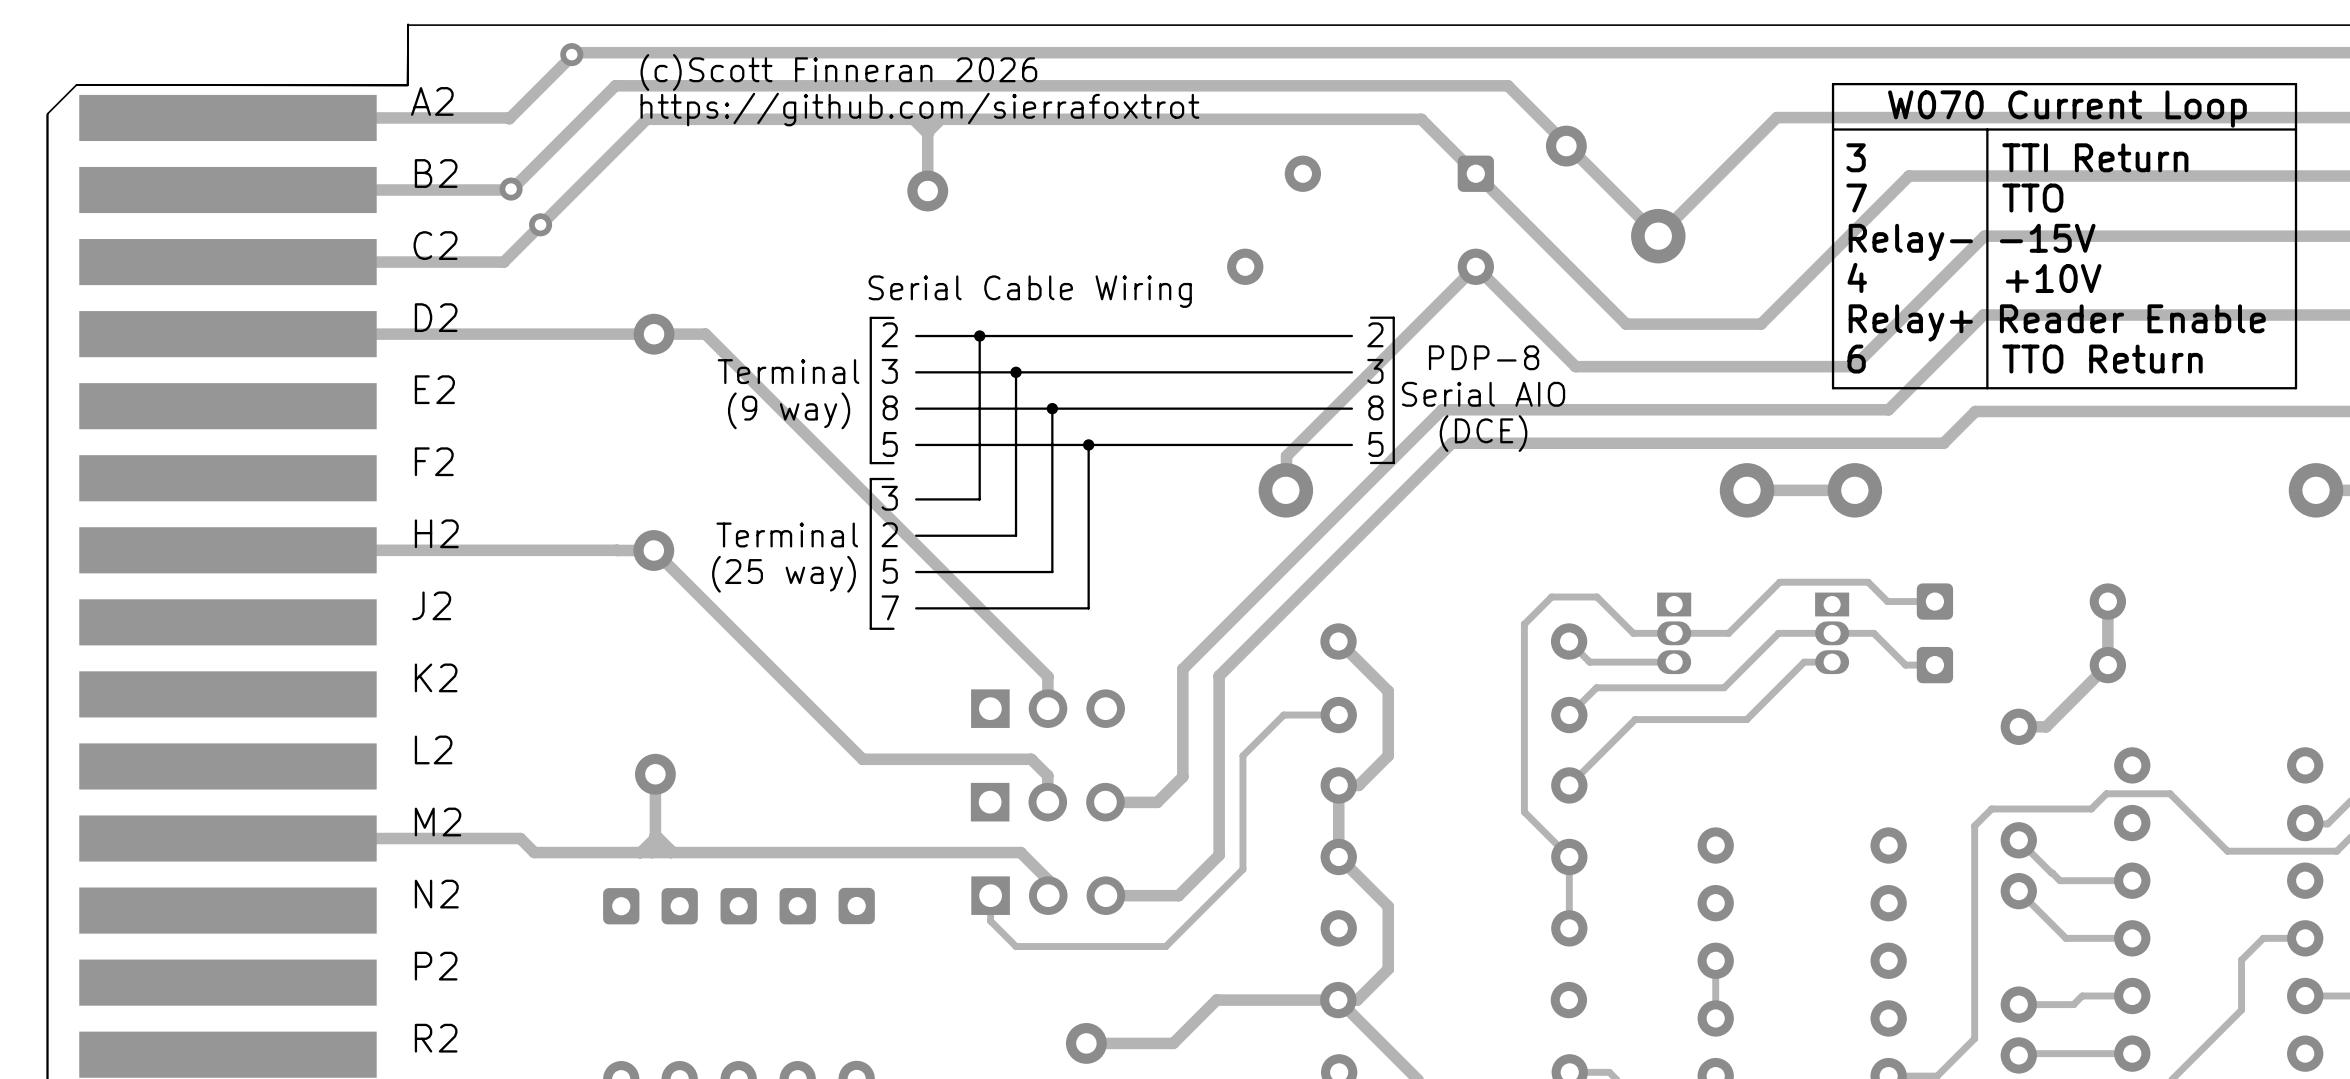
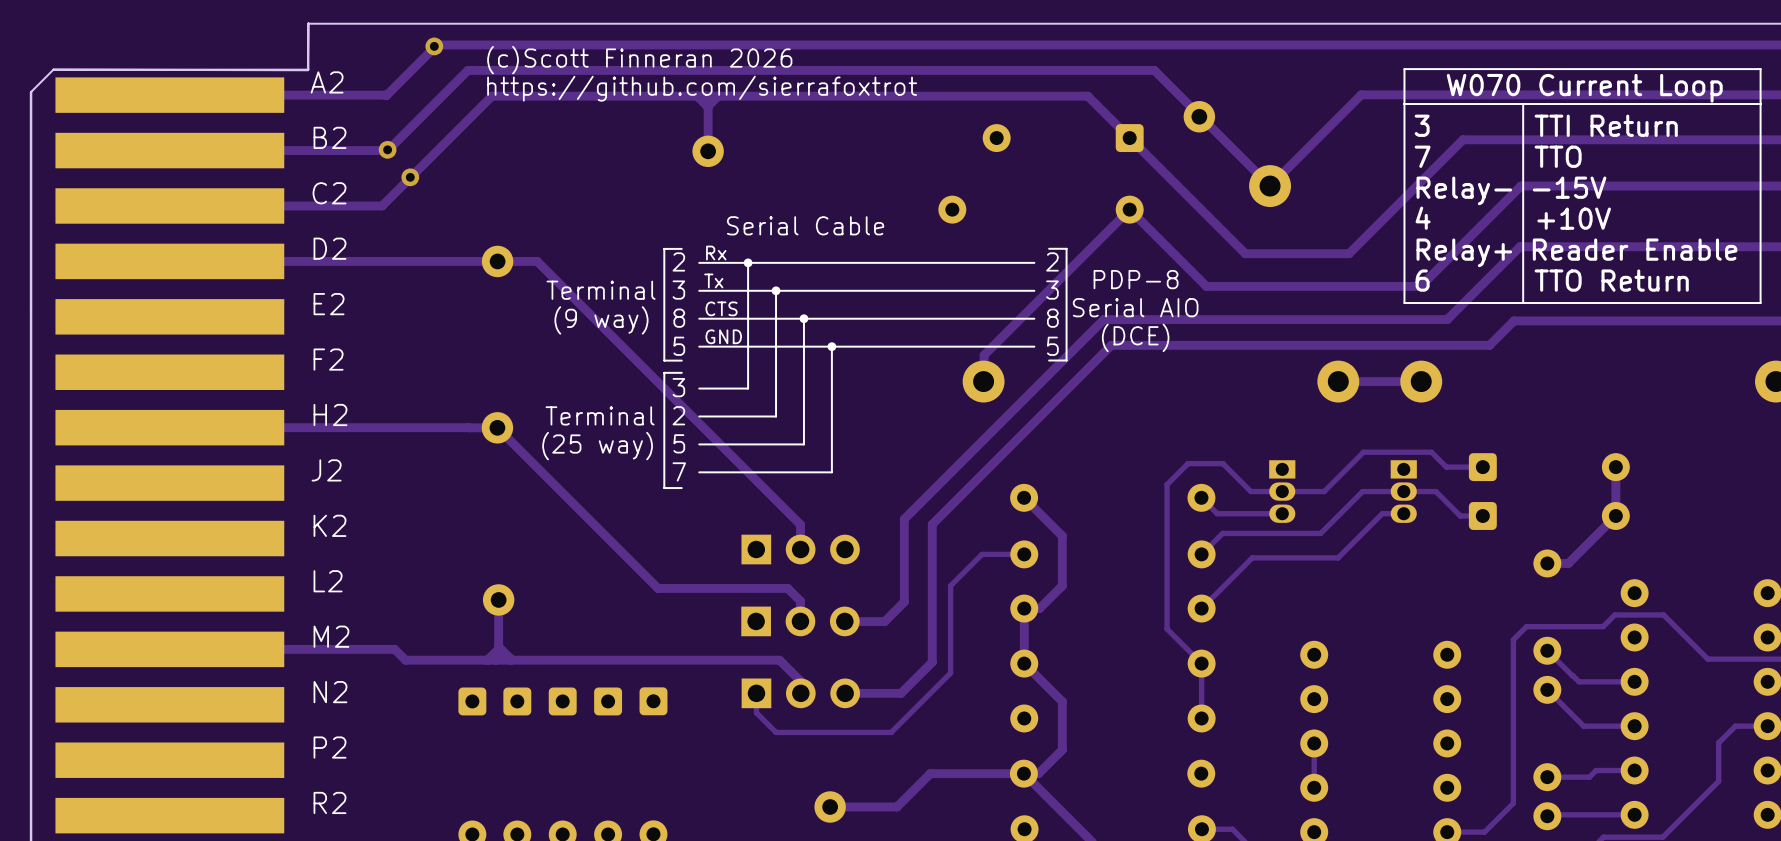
text: Serial Cable Wiring (1030, 291) -> Serial Cable (805, 225)
text: none -> Rx (716, 253)
text: none -> Tx (713, 280)
text: none -> CTS (721, 308)
text: none -> GND (723, 336)

